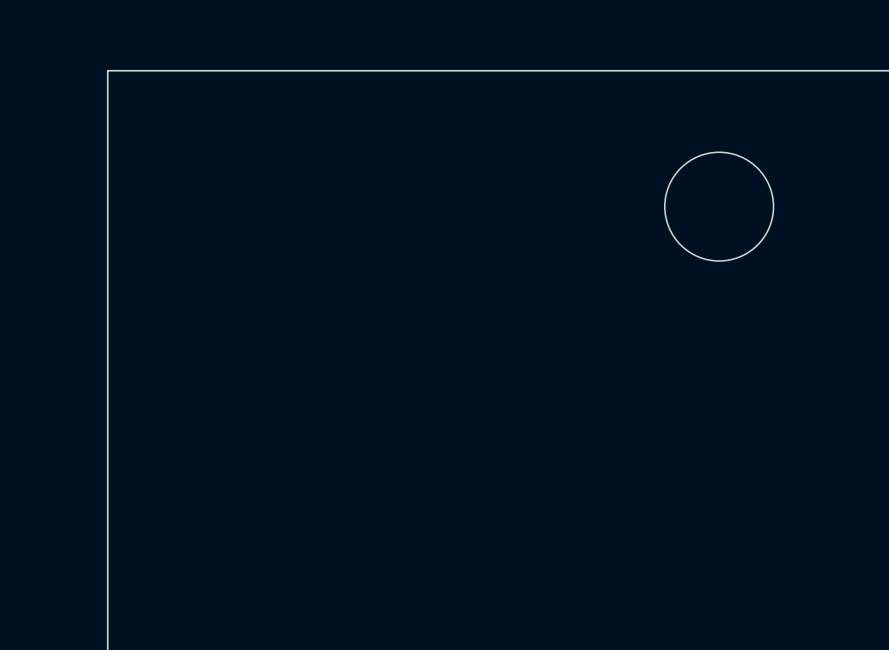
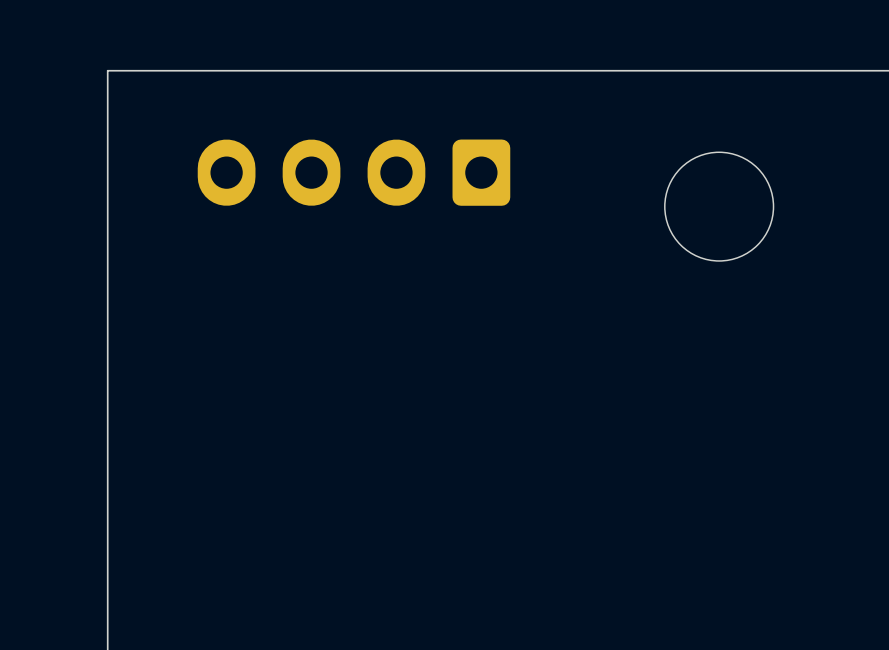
part: none -> (353, 172)

